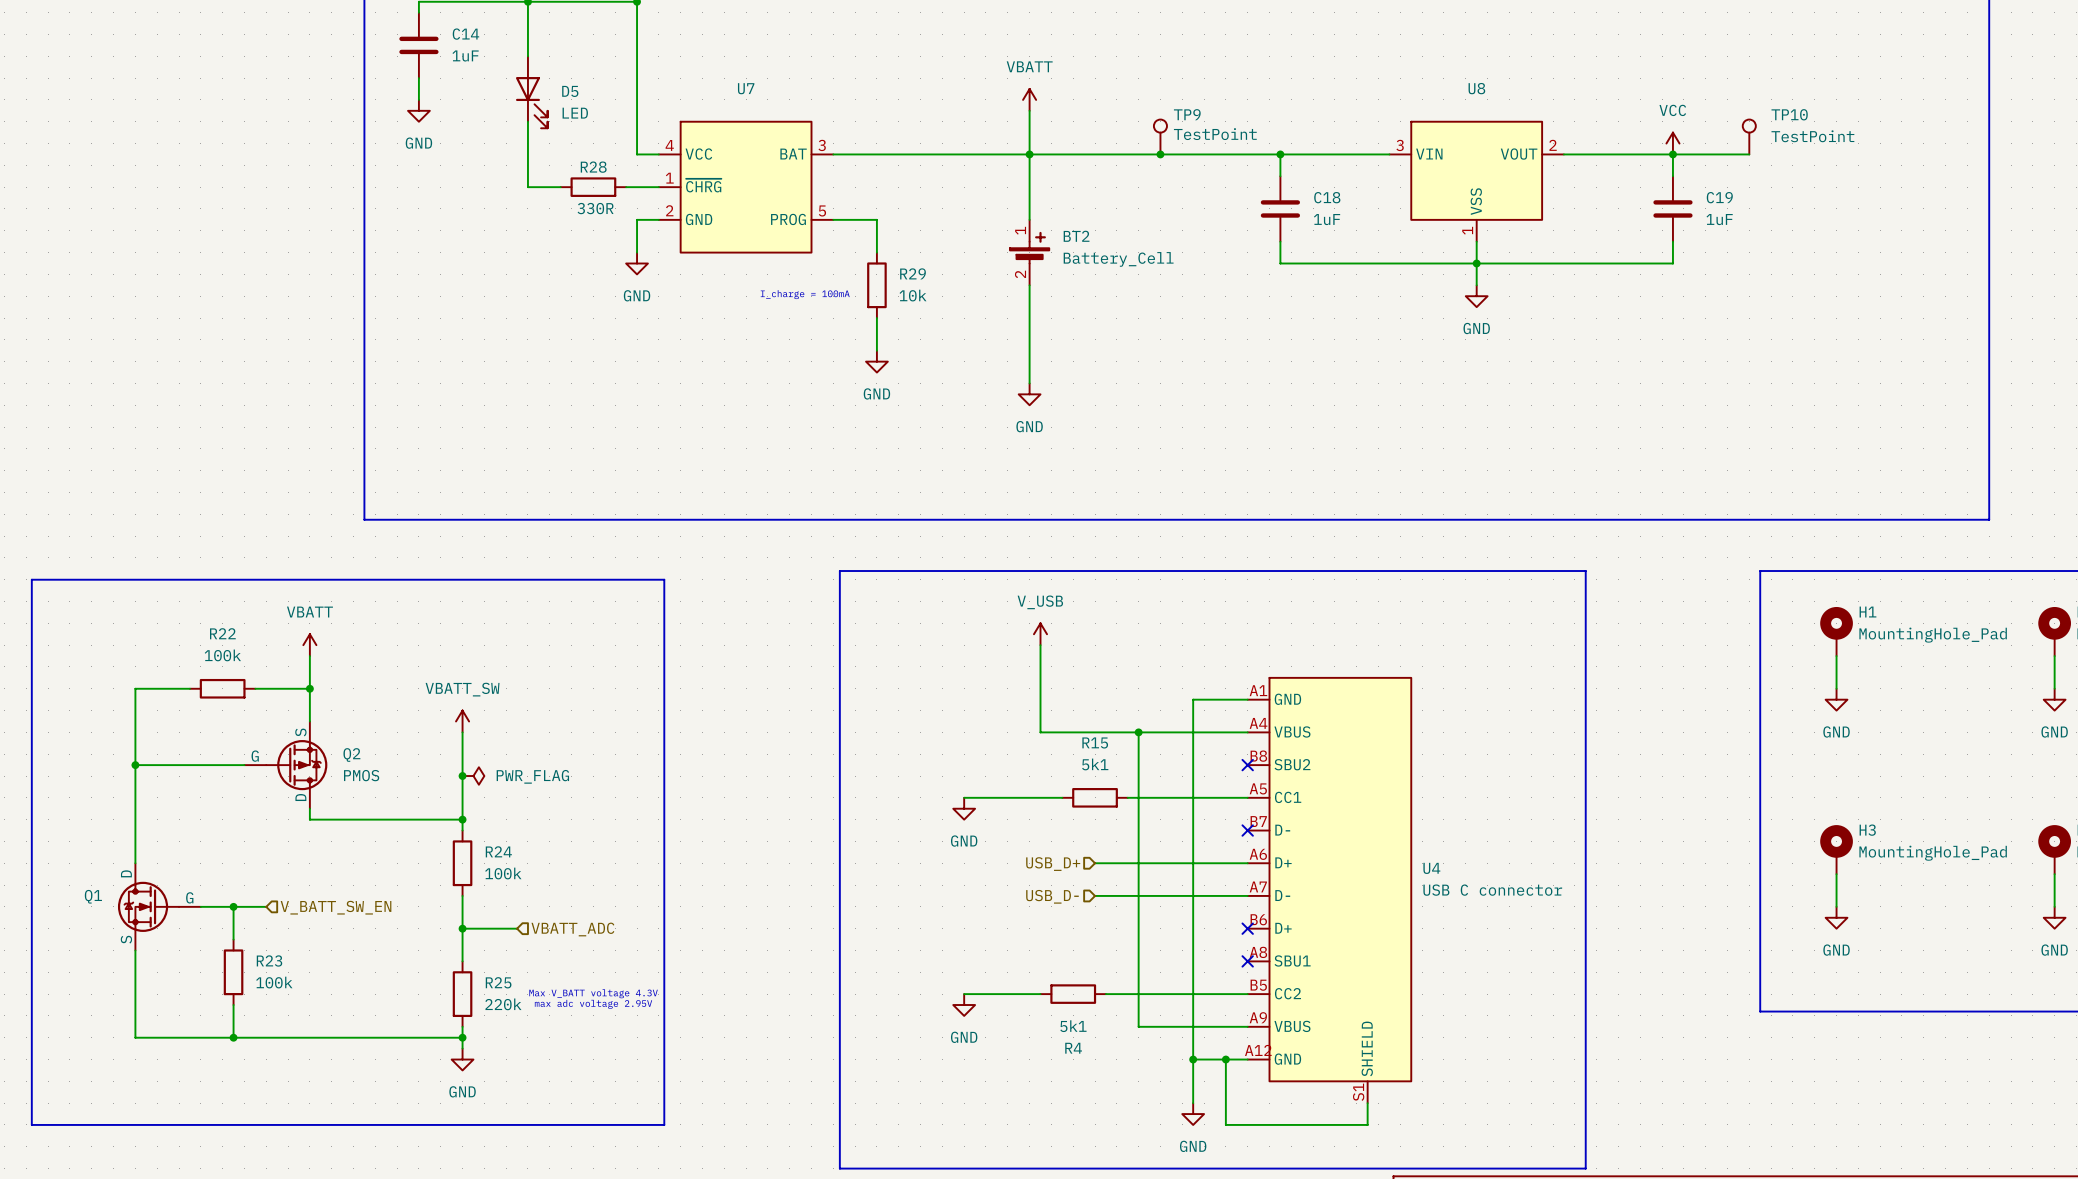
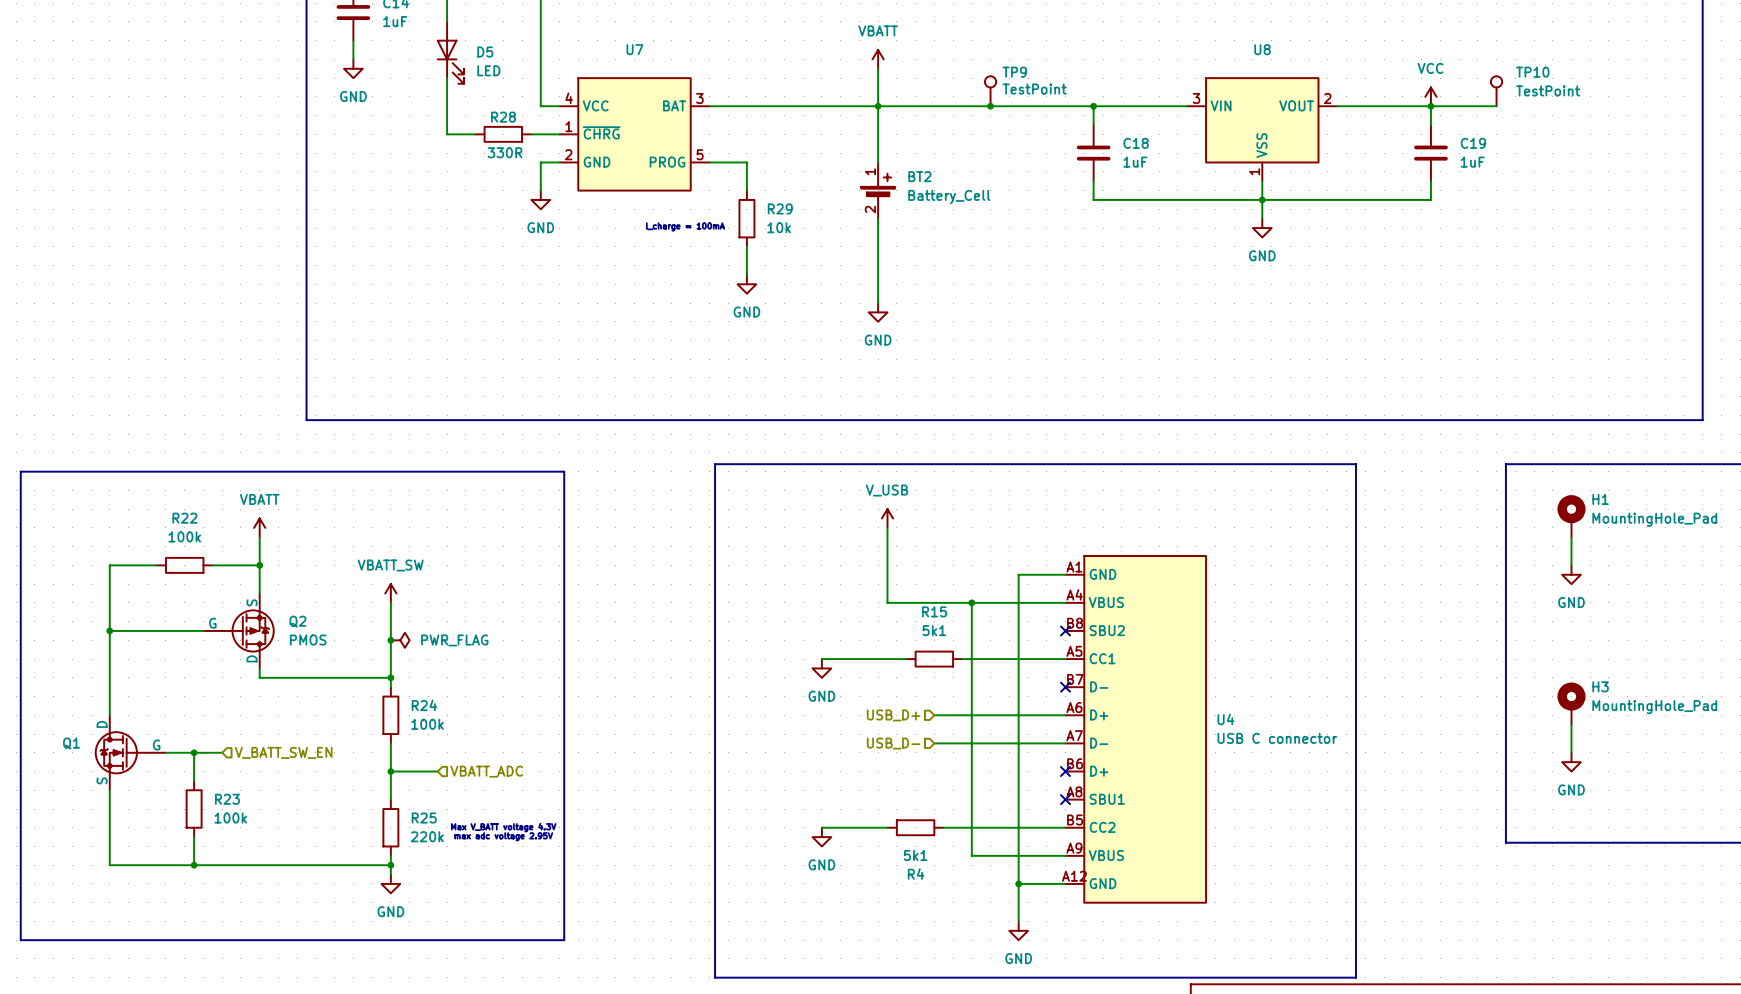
U4 symbol: [1247, 677, 1412, 1104] -> [1065, 556, 1207, 903]
wire: (1225, 1059) (1225, 1124) (1367, 1124) (1367, 1103) -> none
junction: (1225, 1059) -> none

